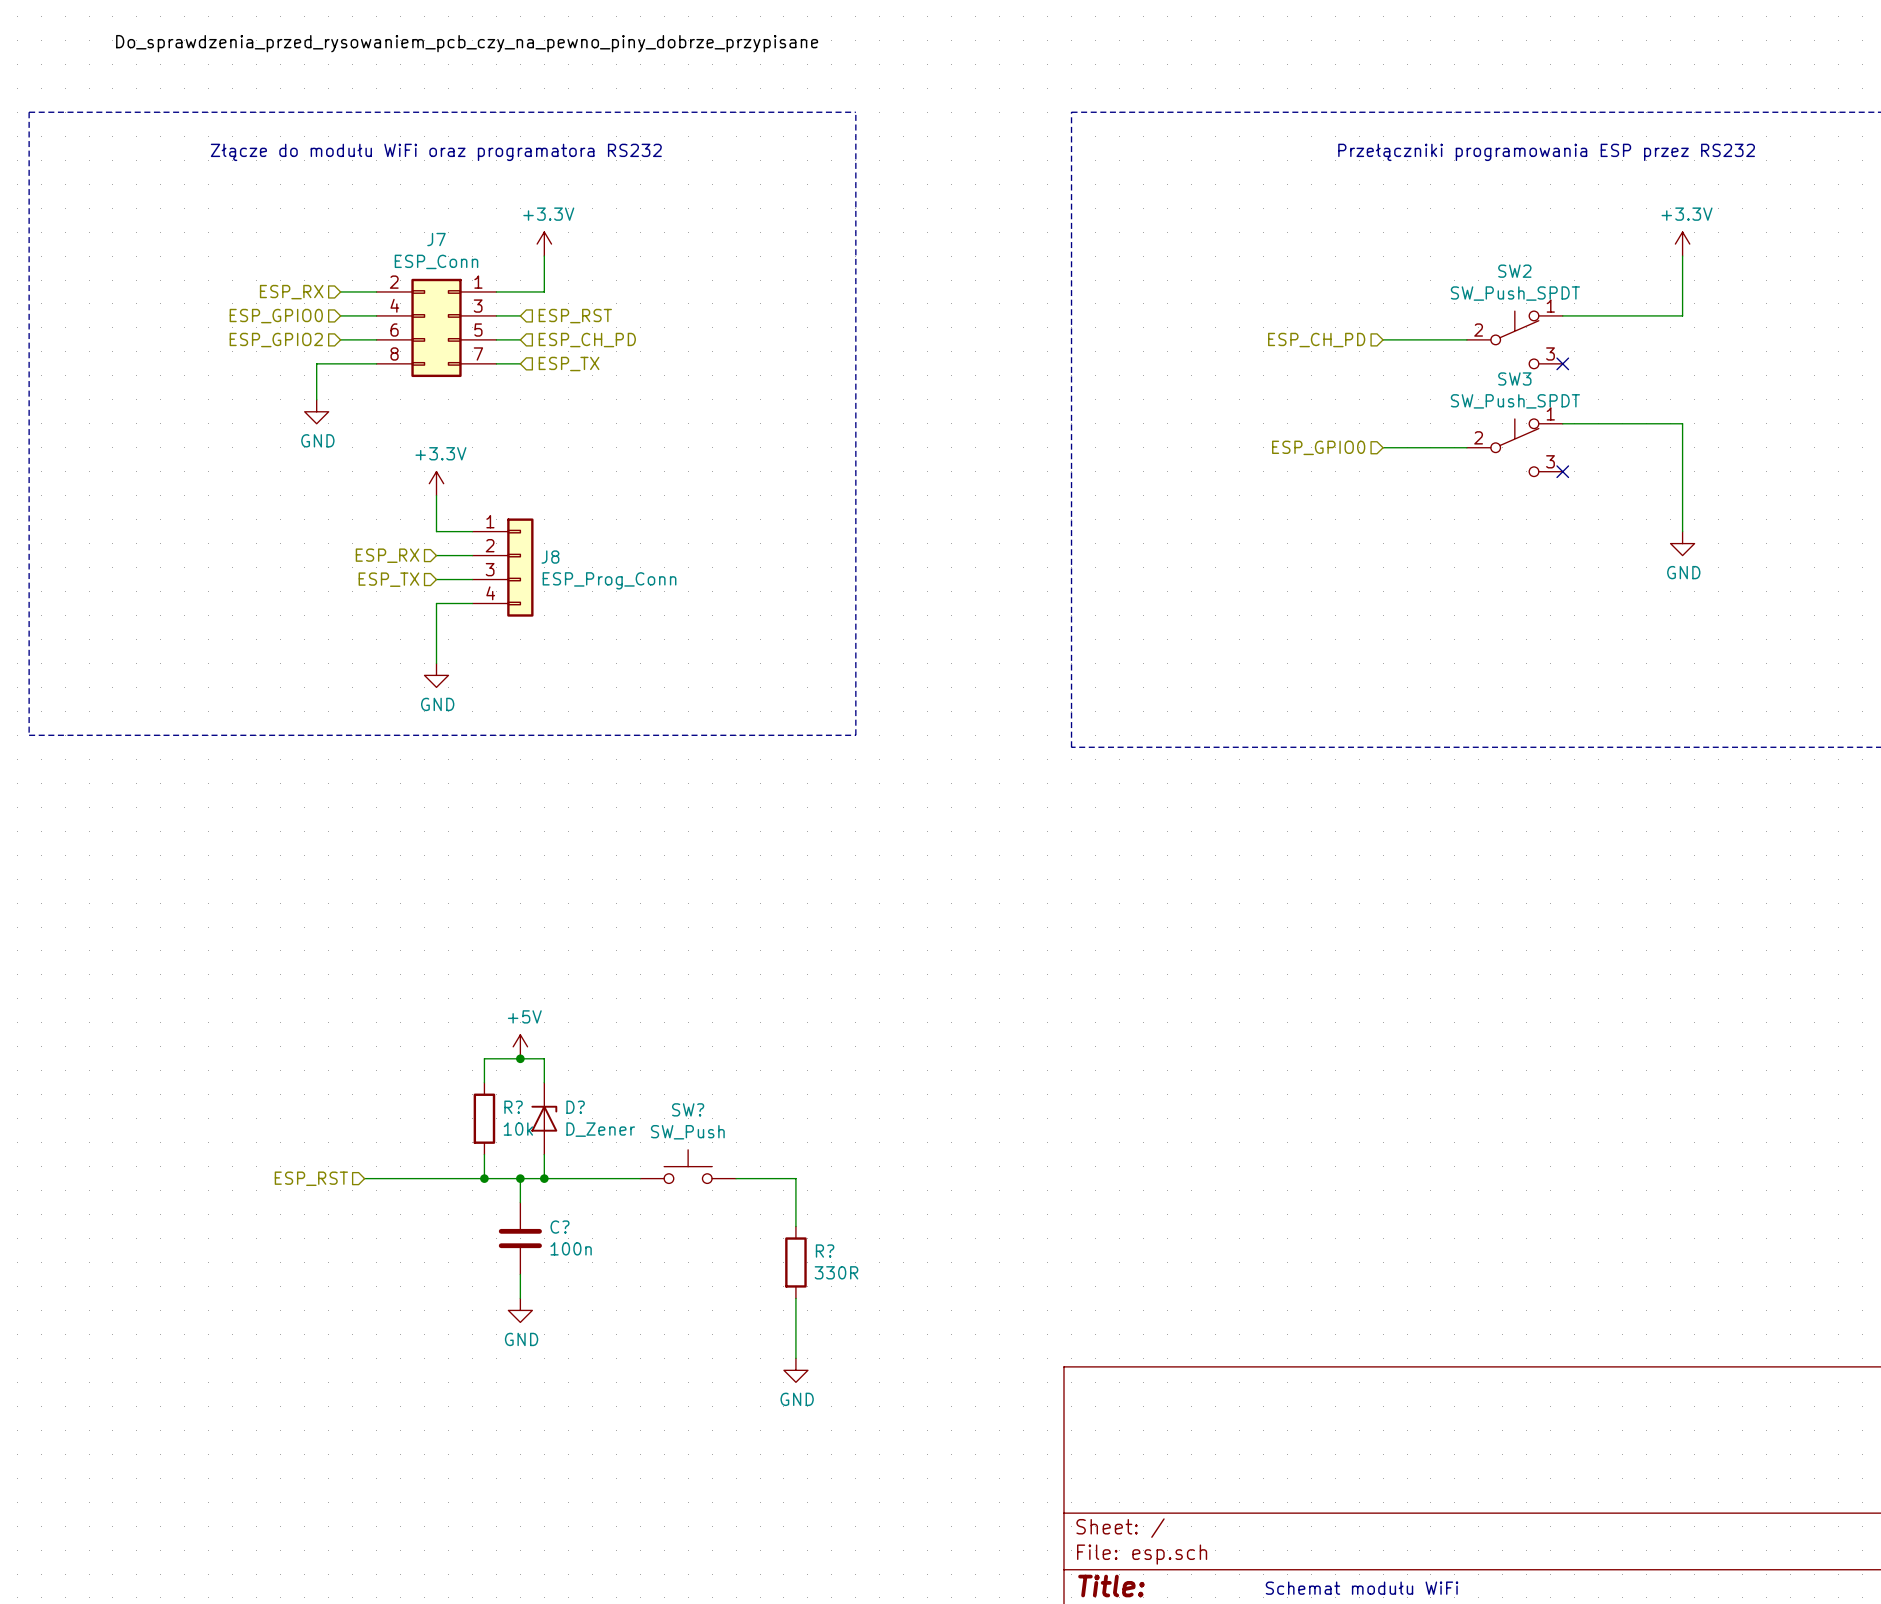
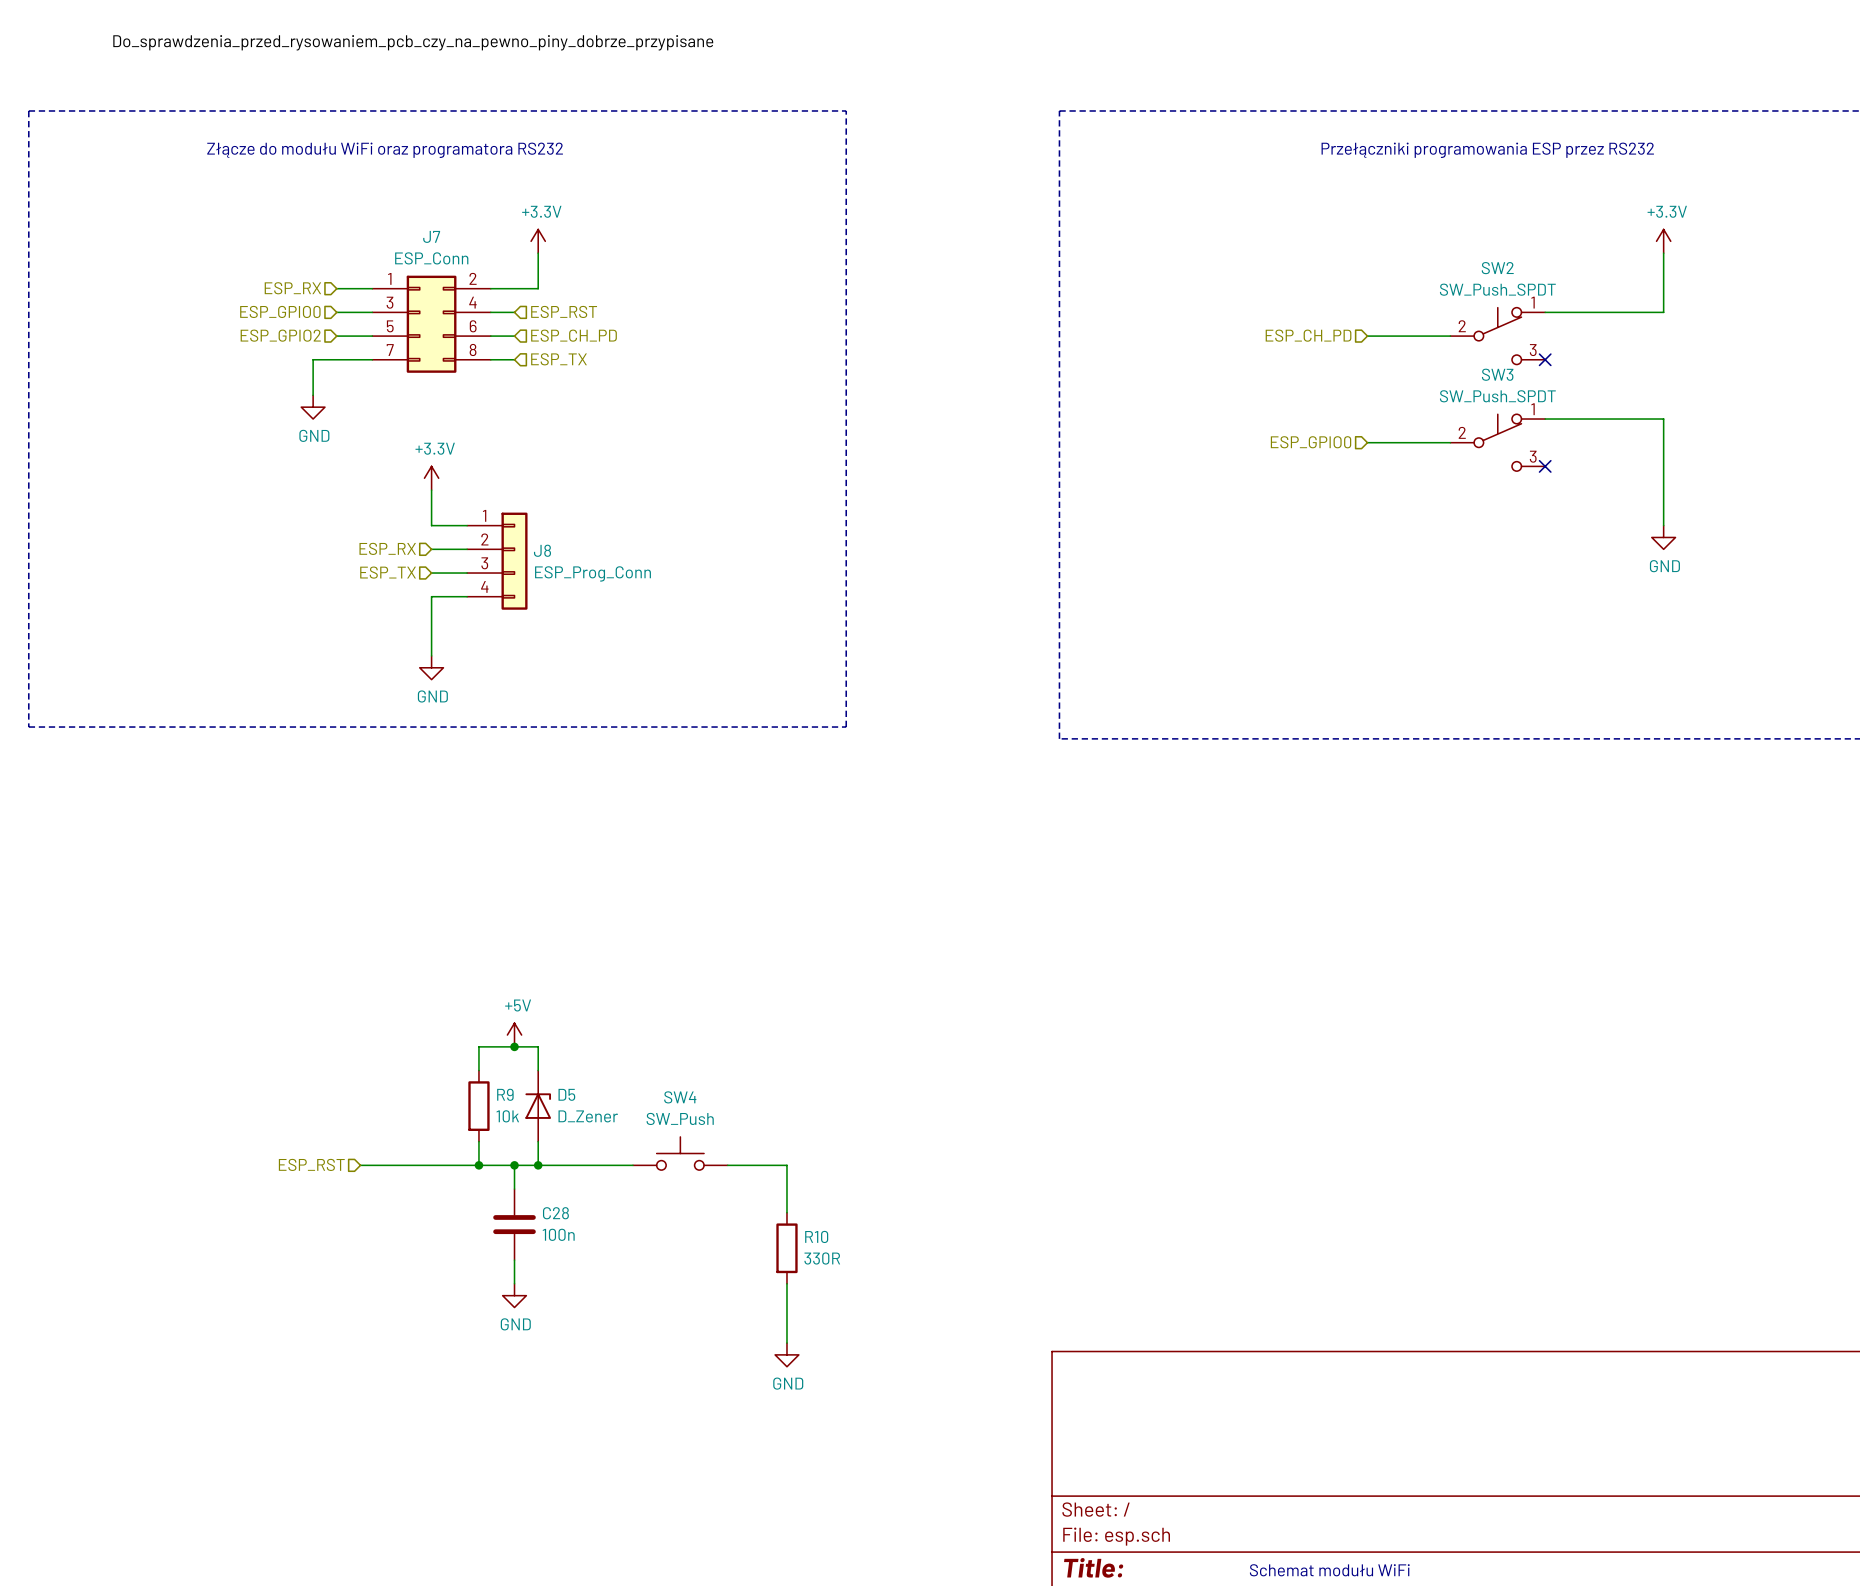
J7 flip: as is (436, 327) -> left-right (431, 324)
R? name: R? (513, 1107) -> R9 (505, 1094)
D? name: D? (575, 1107) -> D5 (566, 1094)
SW? name: SW? (688, 1109) -> SW4 (680, 1097)
C? name: C? (560, 1227) -> C28 (555, 1213)
R? name: R? (825, 1251) -> R10 (816, 1236)

